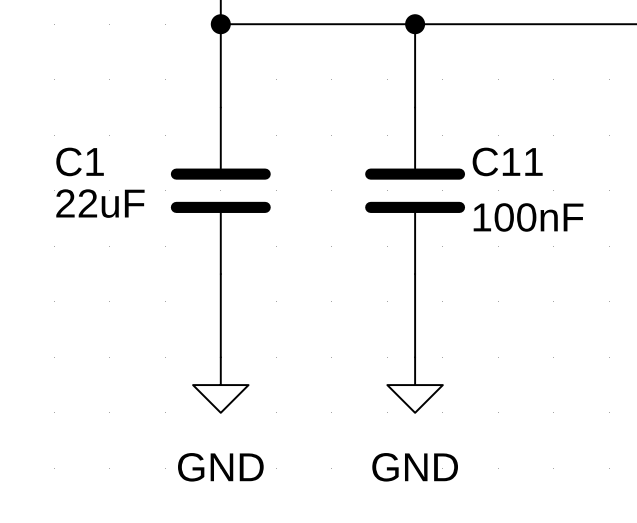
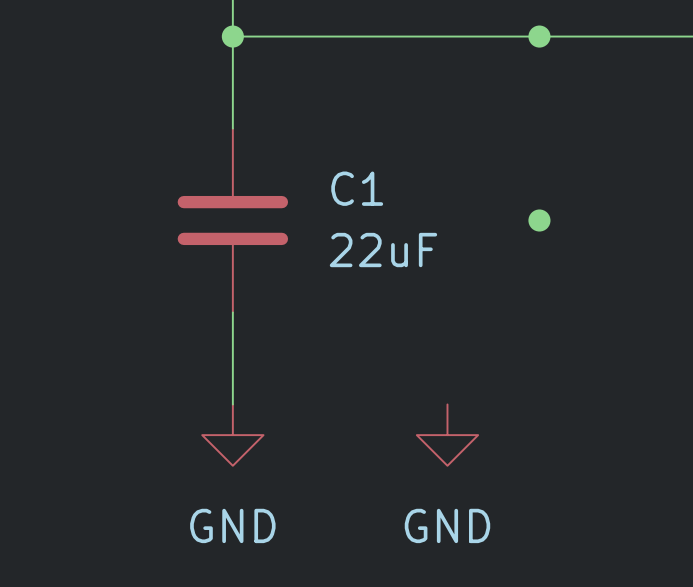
wire: (415, 24) (415, 107) -> none
junction: (415, 24) -> none
junction: none -> (539, 36)
C1 name position: C1 (80, 161) -> C1 (357, 188)
C11: 100nF (415, 190) -> none
junction: none -> (539, 220)
C1 value position: 22uF (100, 203) -> 22uF (383, 250)
wire: (415, 274) (415, 357) -> none

